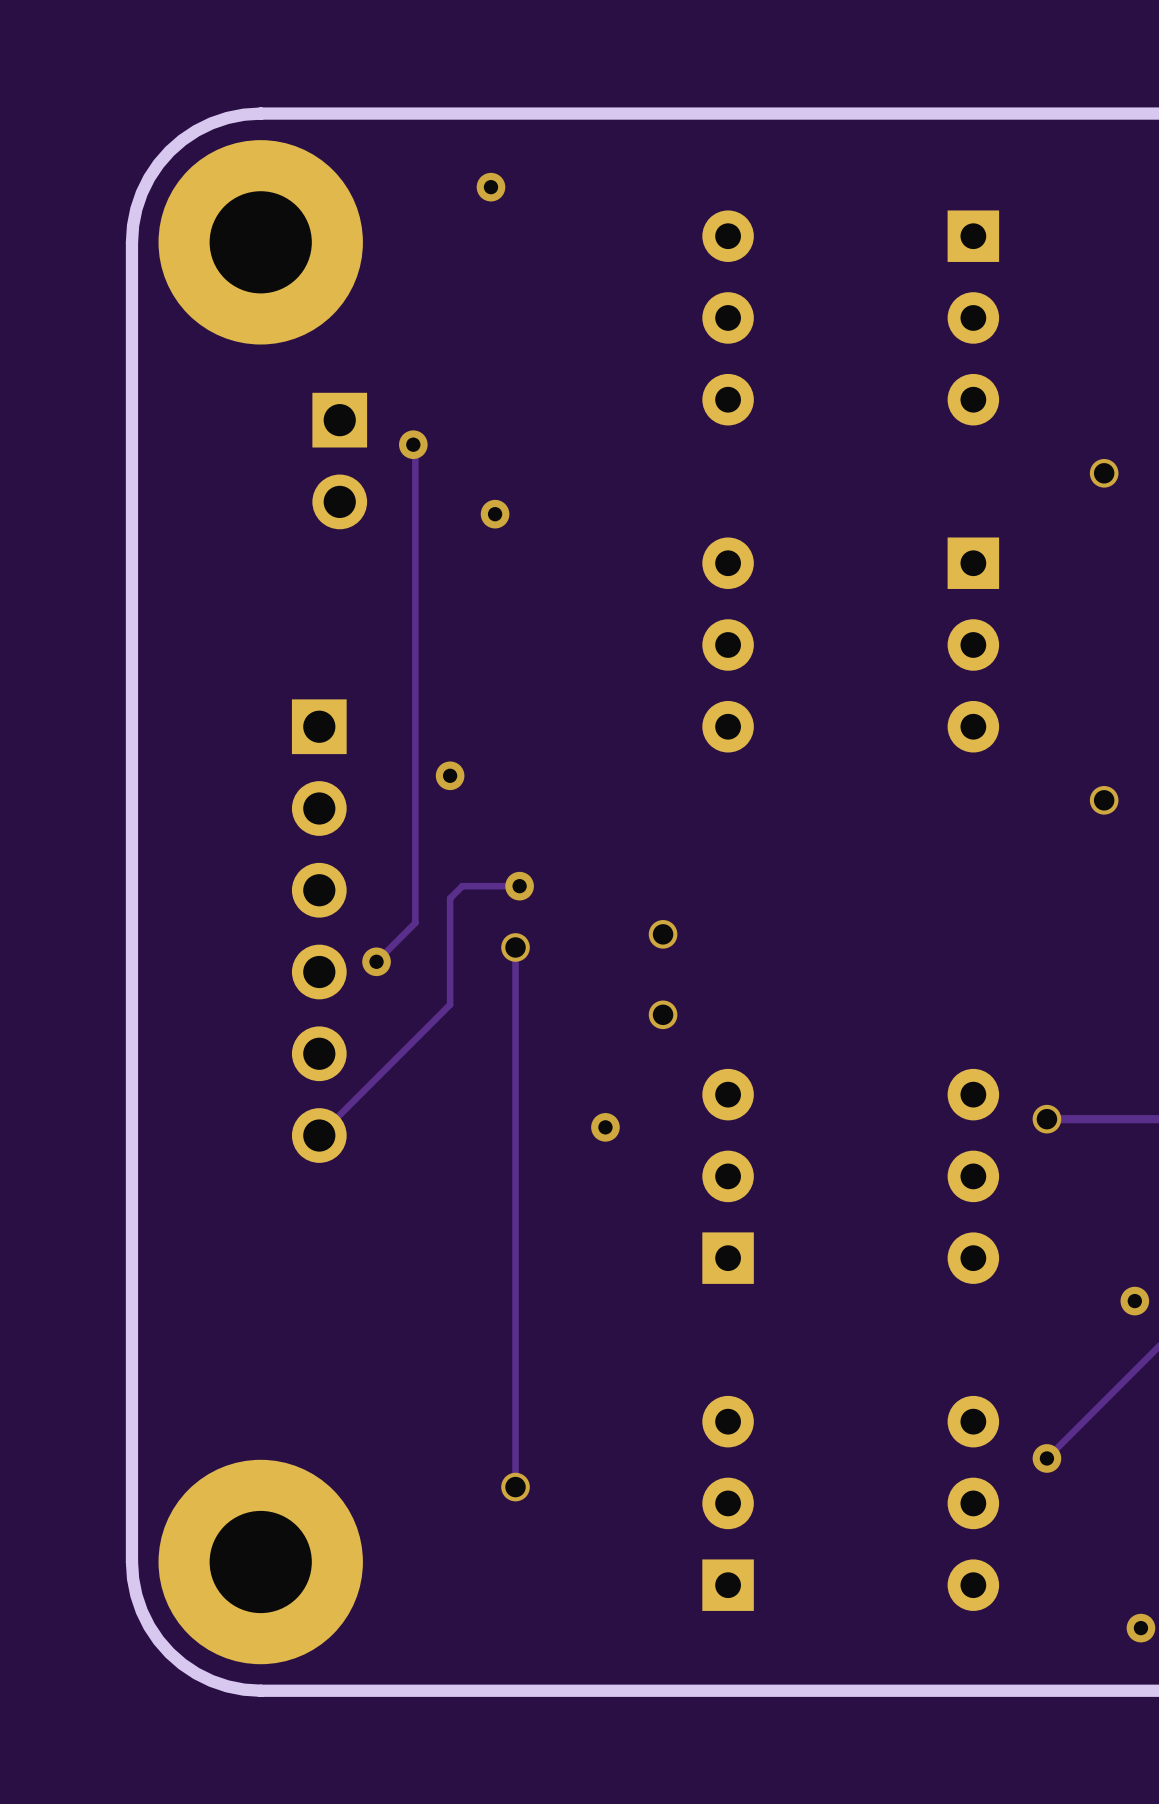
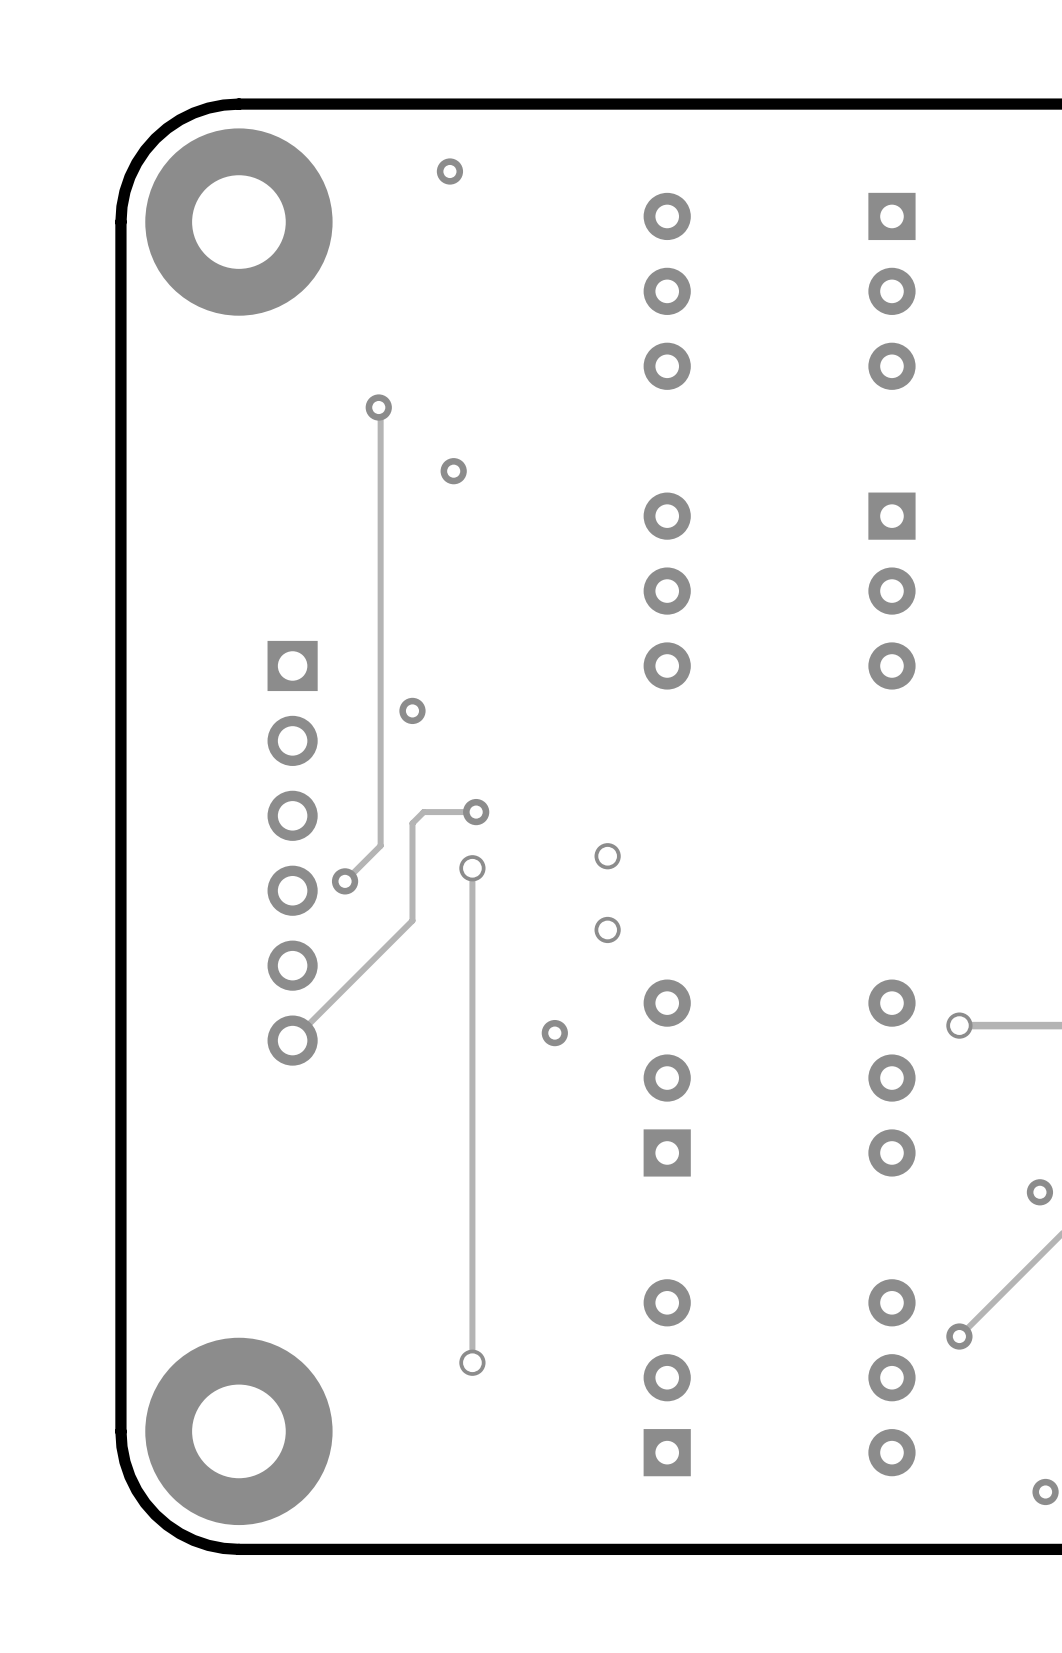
part: (339, 461) -> none
via: (1104, 473) -> none
via: (1104, 800) -> none

